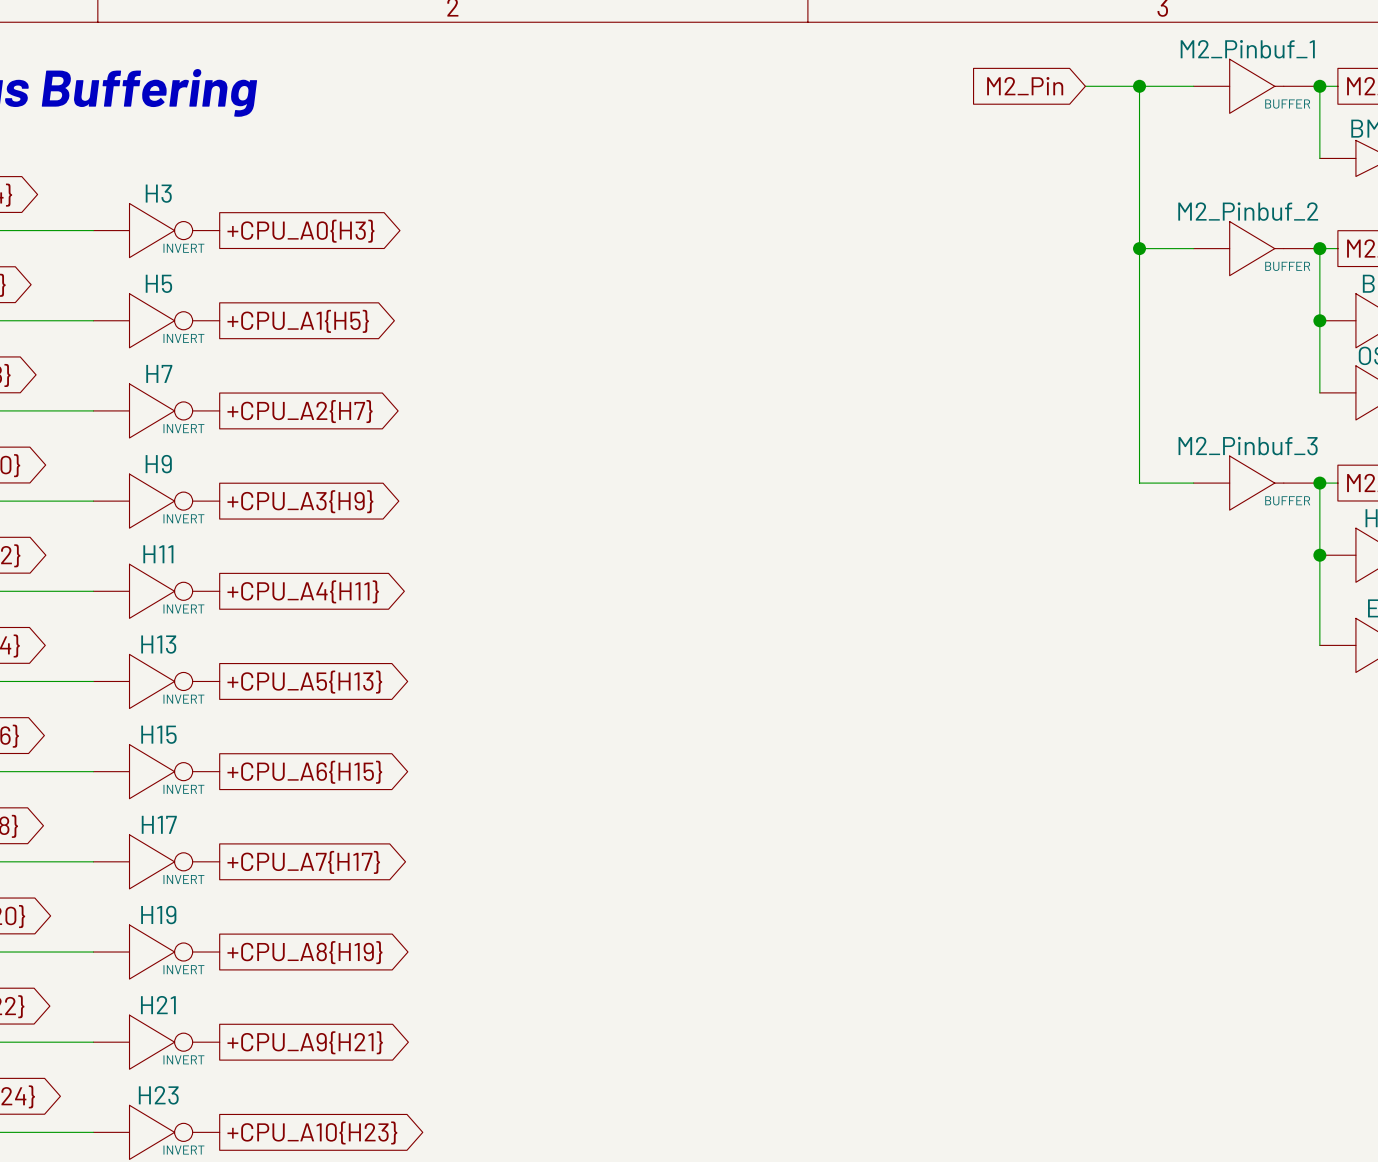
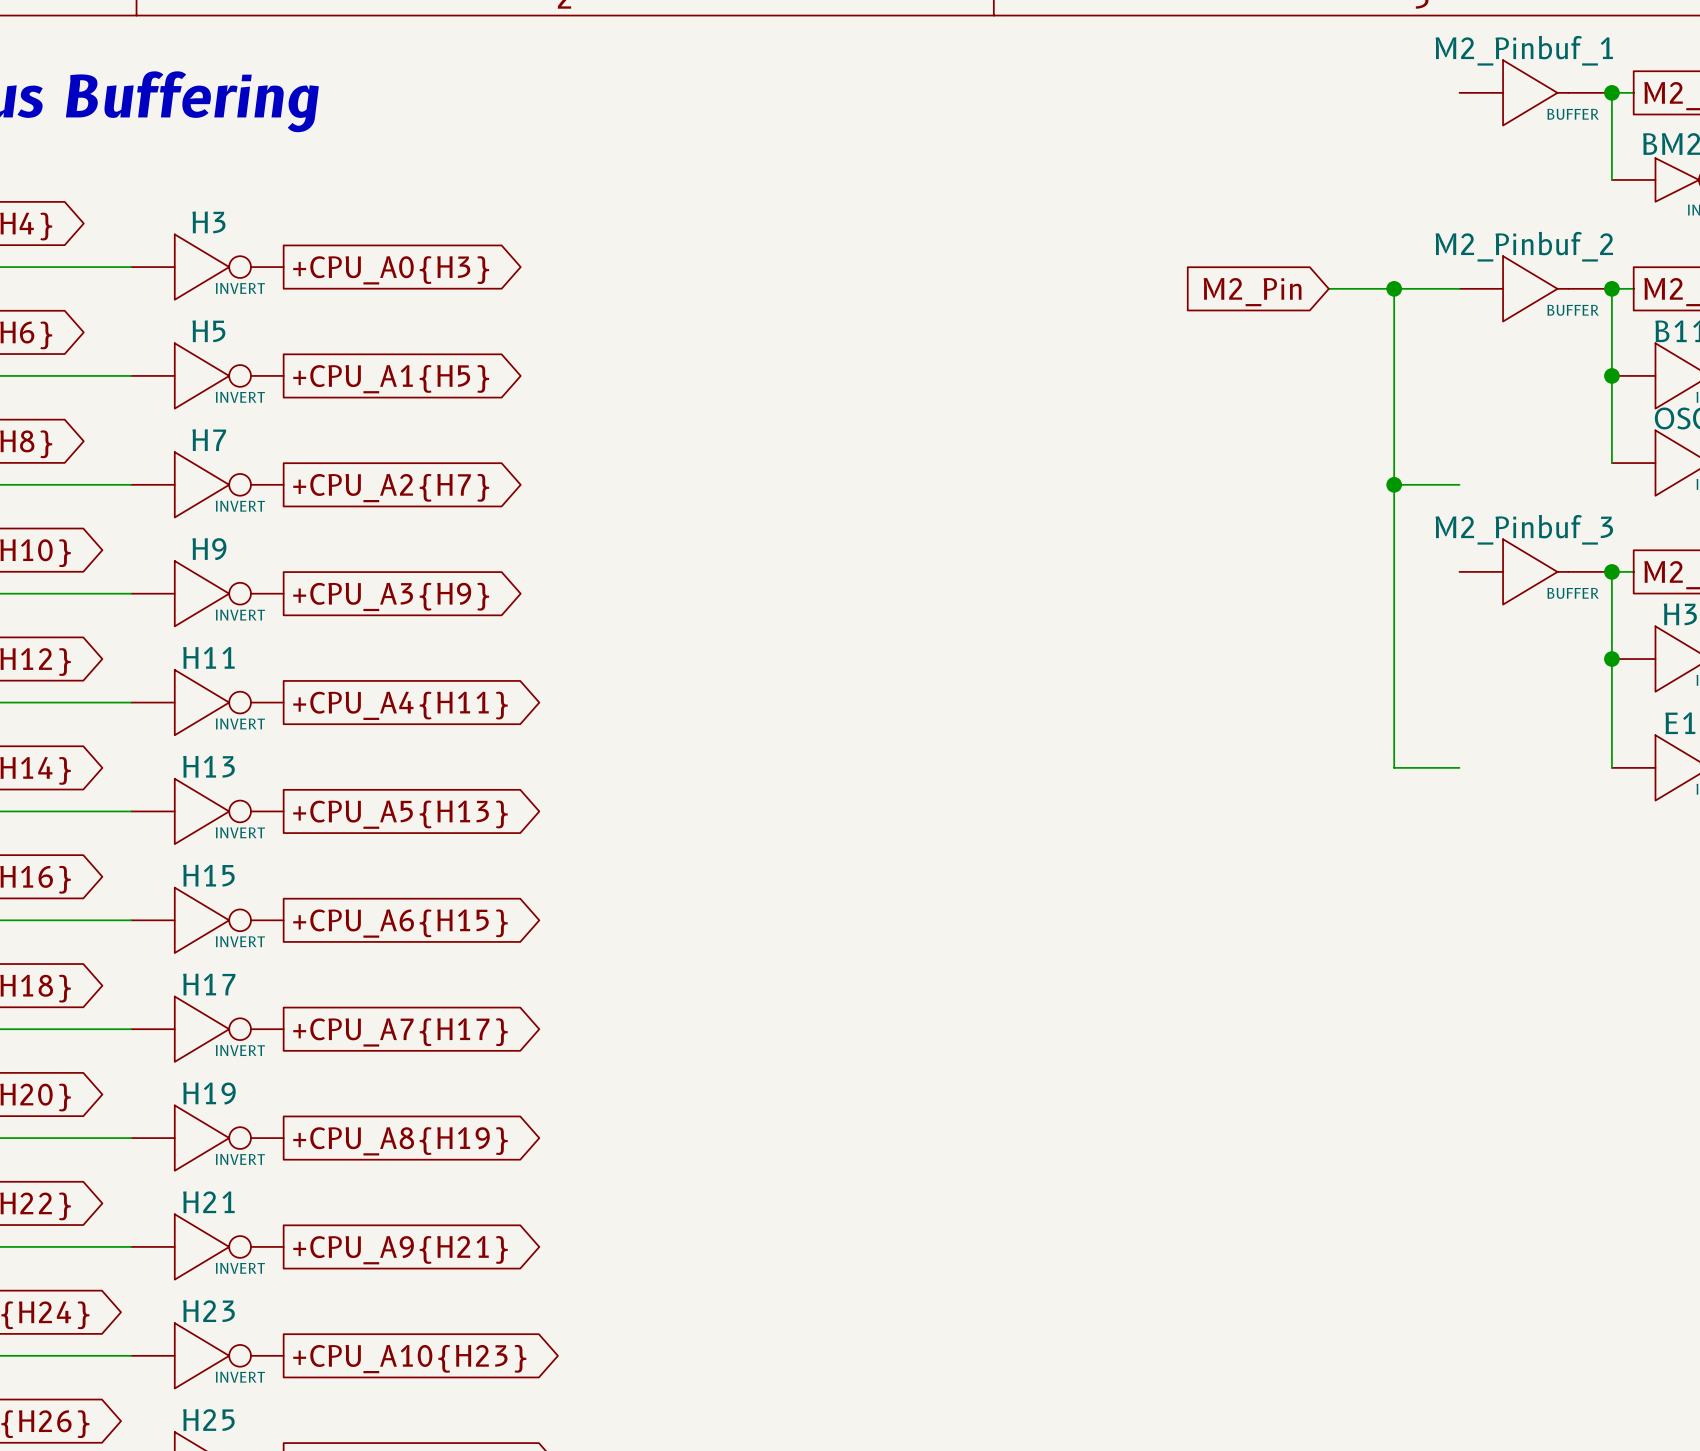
global label position: M2_Pin (1025, 86) -> M2_Pin (1252, 292)
wire: (1085, 86) (1193, 86) -> none
wire: (1139, 86) (1139, 248) -> (1328, 288) (1394, 288)
junction: (1139, 86) -> none
wire: none -> (1394, 484) (1459, 484)
junction: none -> (1394, 484)
wire: (1139, 483) (1193, 483) -> (1394, 571) (1394, 767) (1459, 767)

